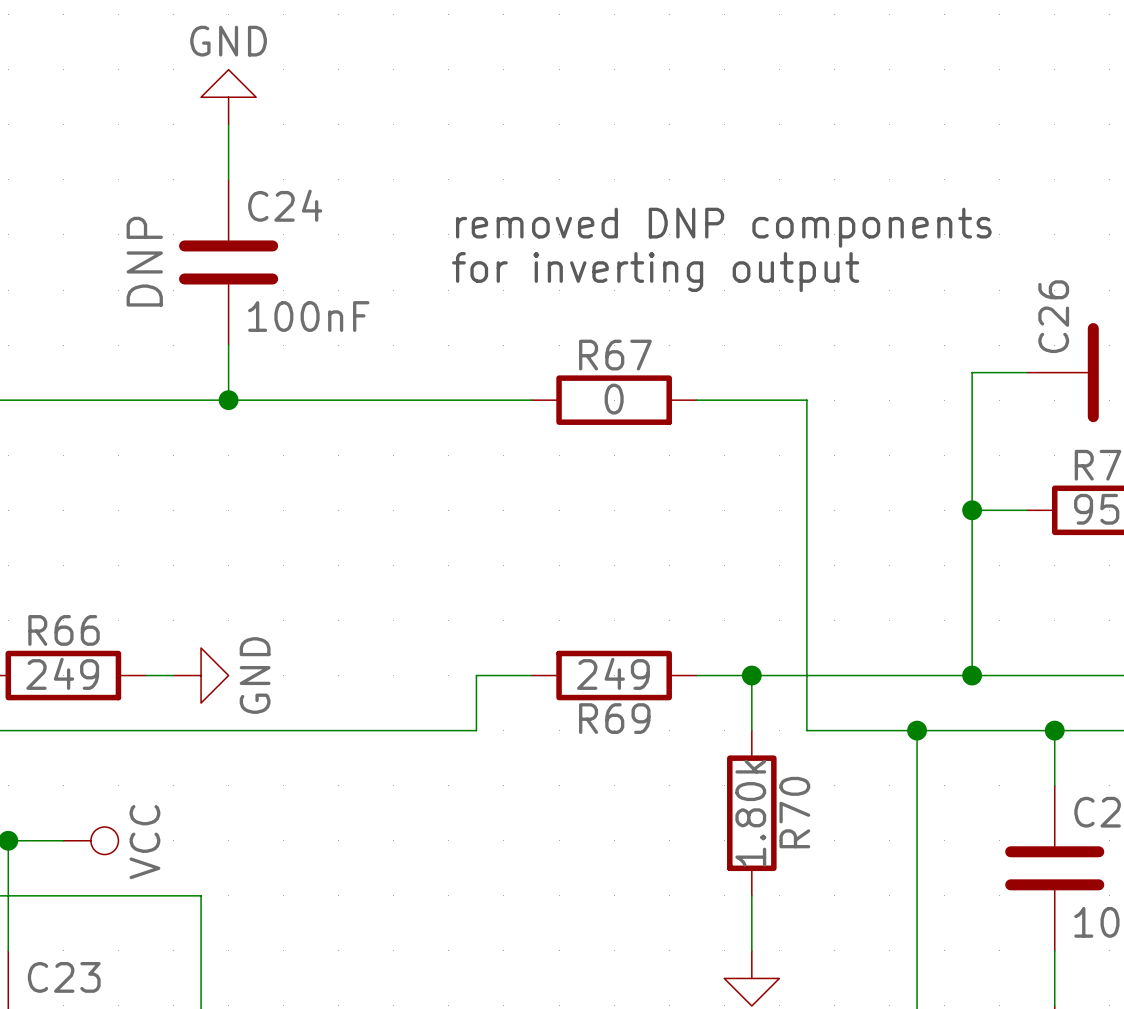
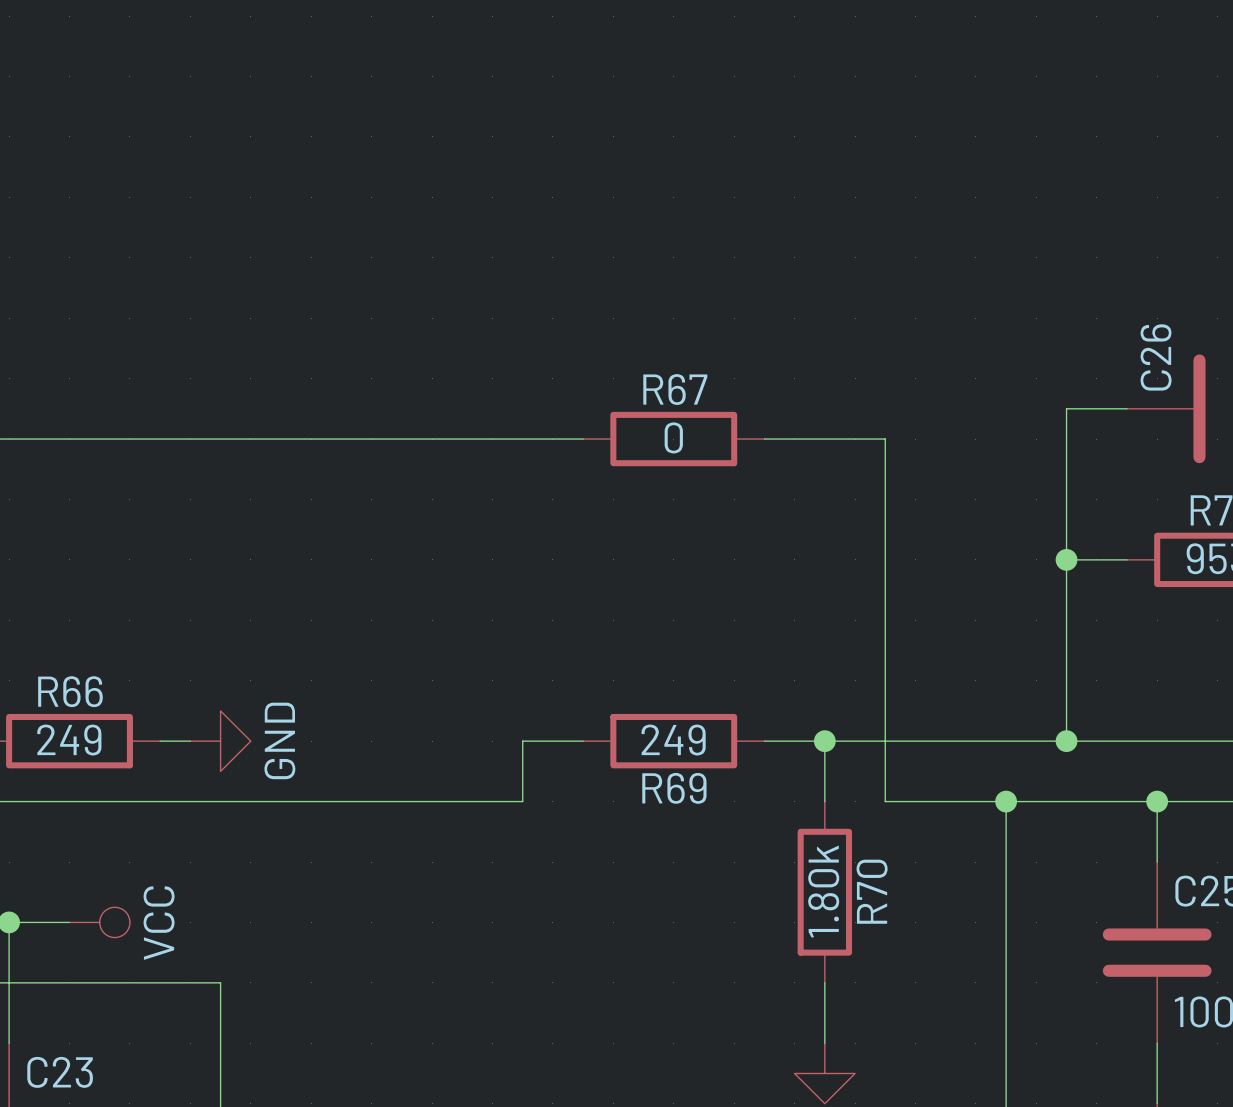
power symbol: GND (228, 97) -> none
wire: (228, 124) (228, 179) -> none
text: removed DNP components (723, 227) -> none
C24: 100nF (228, 262) -> none
text: for inverting output (655, 272) -> none
wire: (228, 345) (228, 400) -> none
junction: (228, 400) -> none

